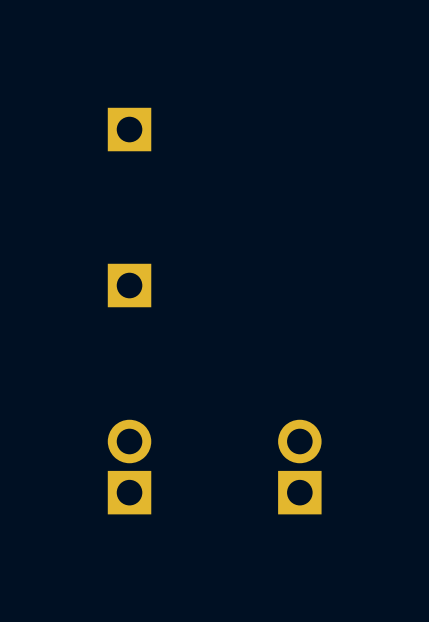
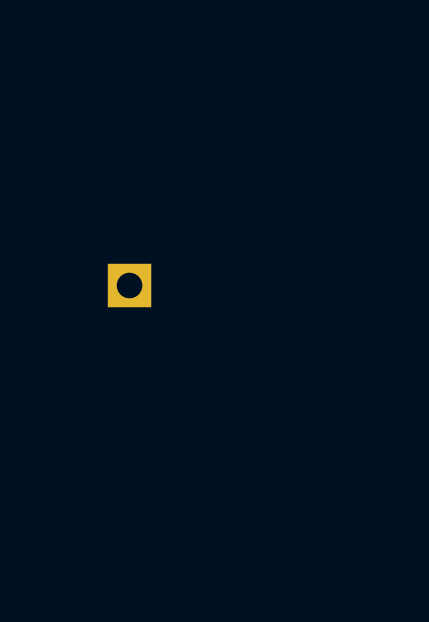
part: (129, 129) -> none
part: (129, 467) -> none
part: (299, 467) -> none

